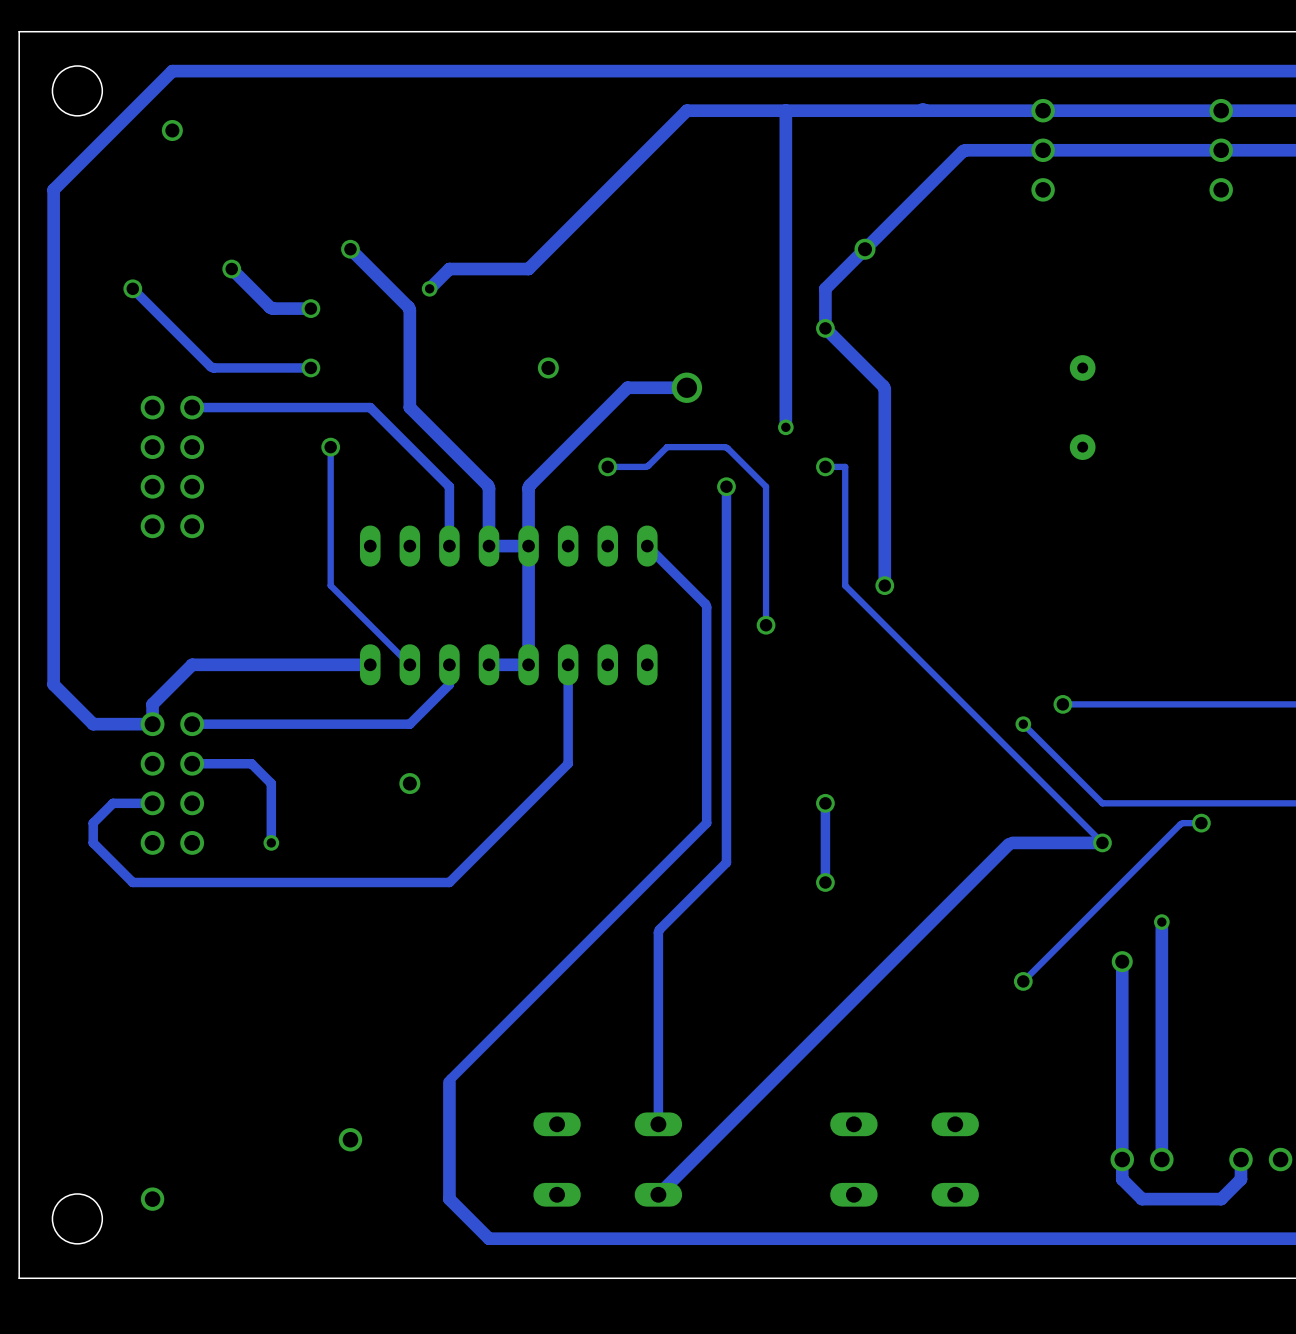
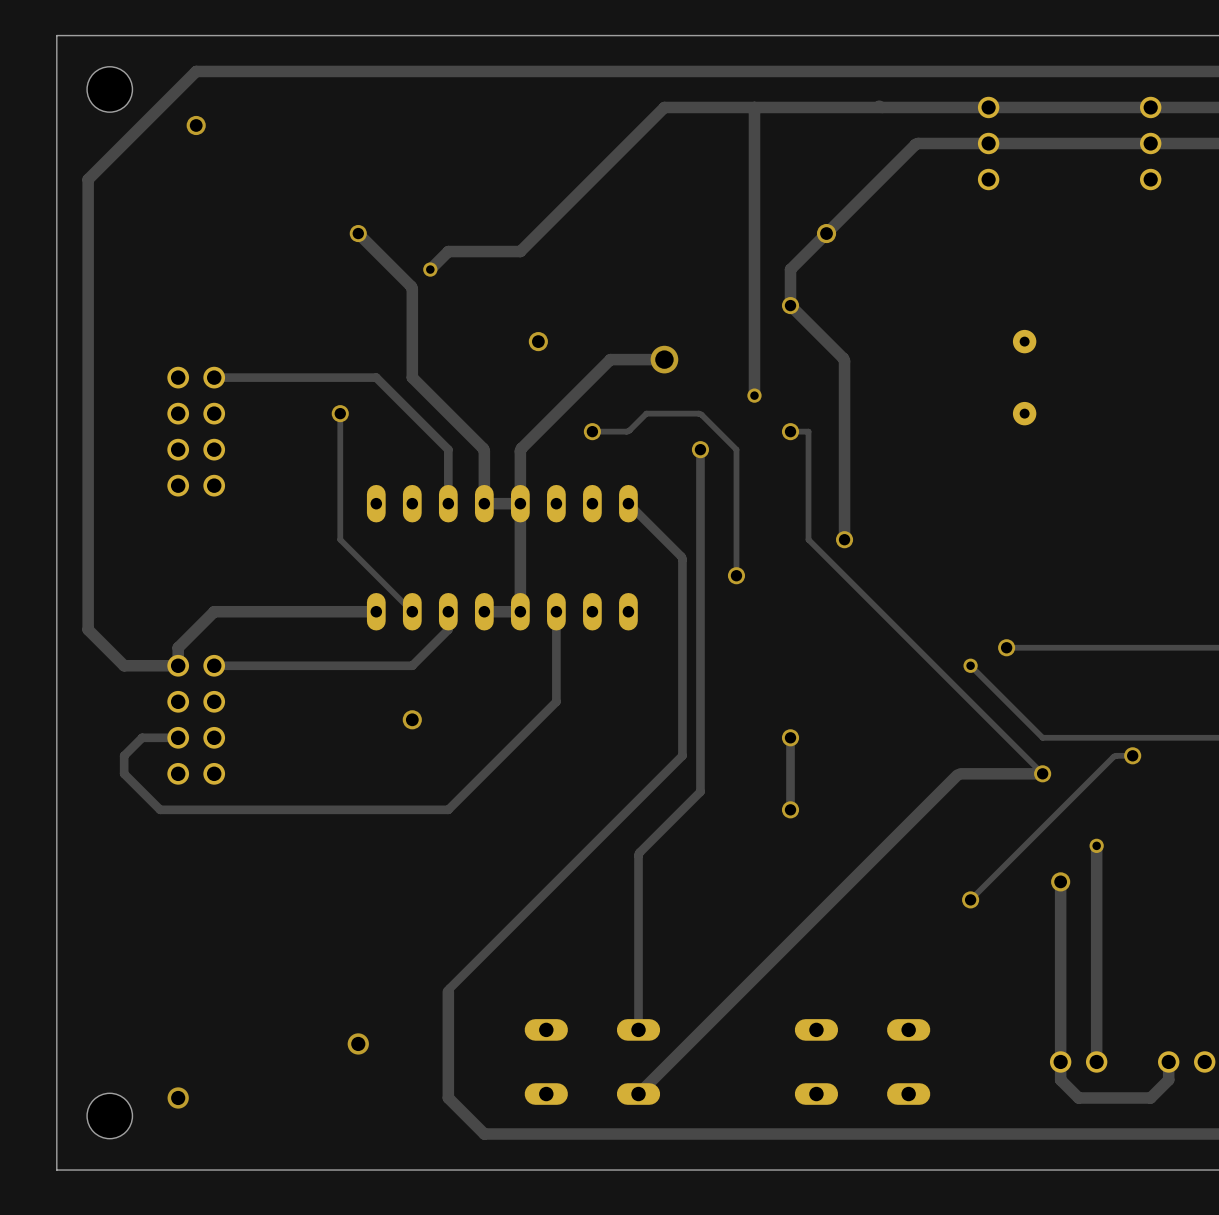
track: (231, 269) (270, 307) (310, 308) -> none
via: (231, 269) -> none
track: (132, 288) (212, 367) (310, 367) -> none
via: (132, 288) -> none
via: (310, 308) -> none
via: (310, 367) -> none
track: (192, 763) (251, 763) (271, 783) (271, 842) -> none
via: (271, 842) -> none

